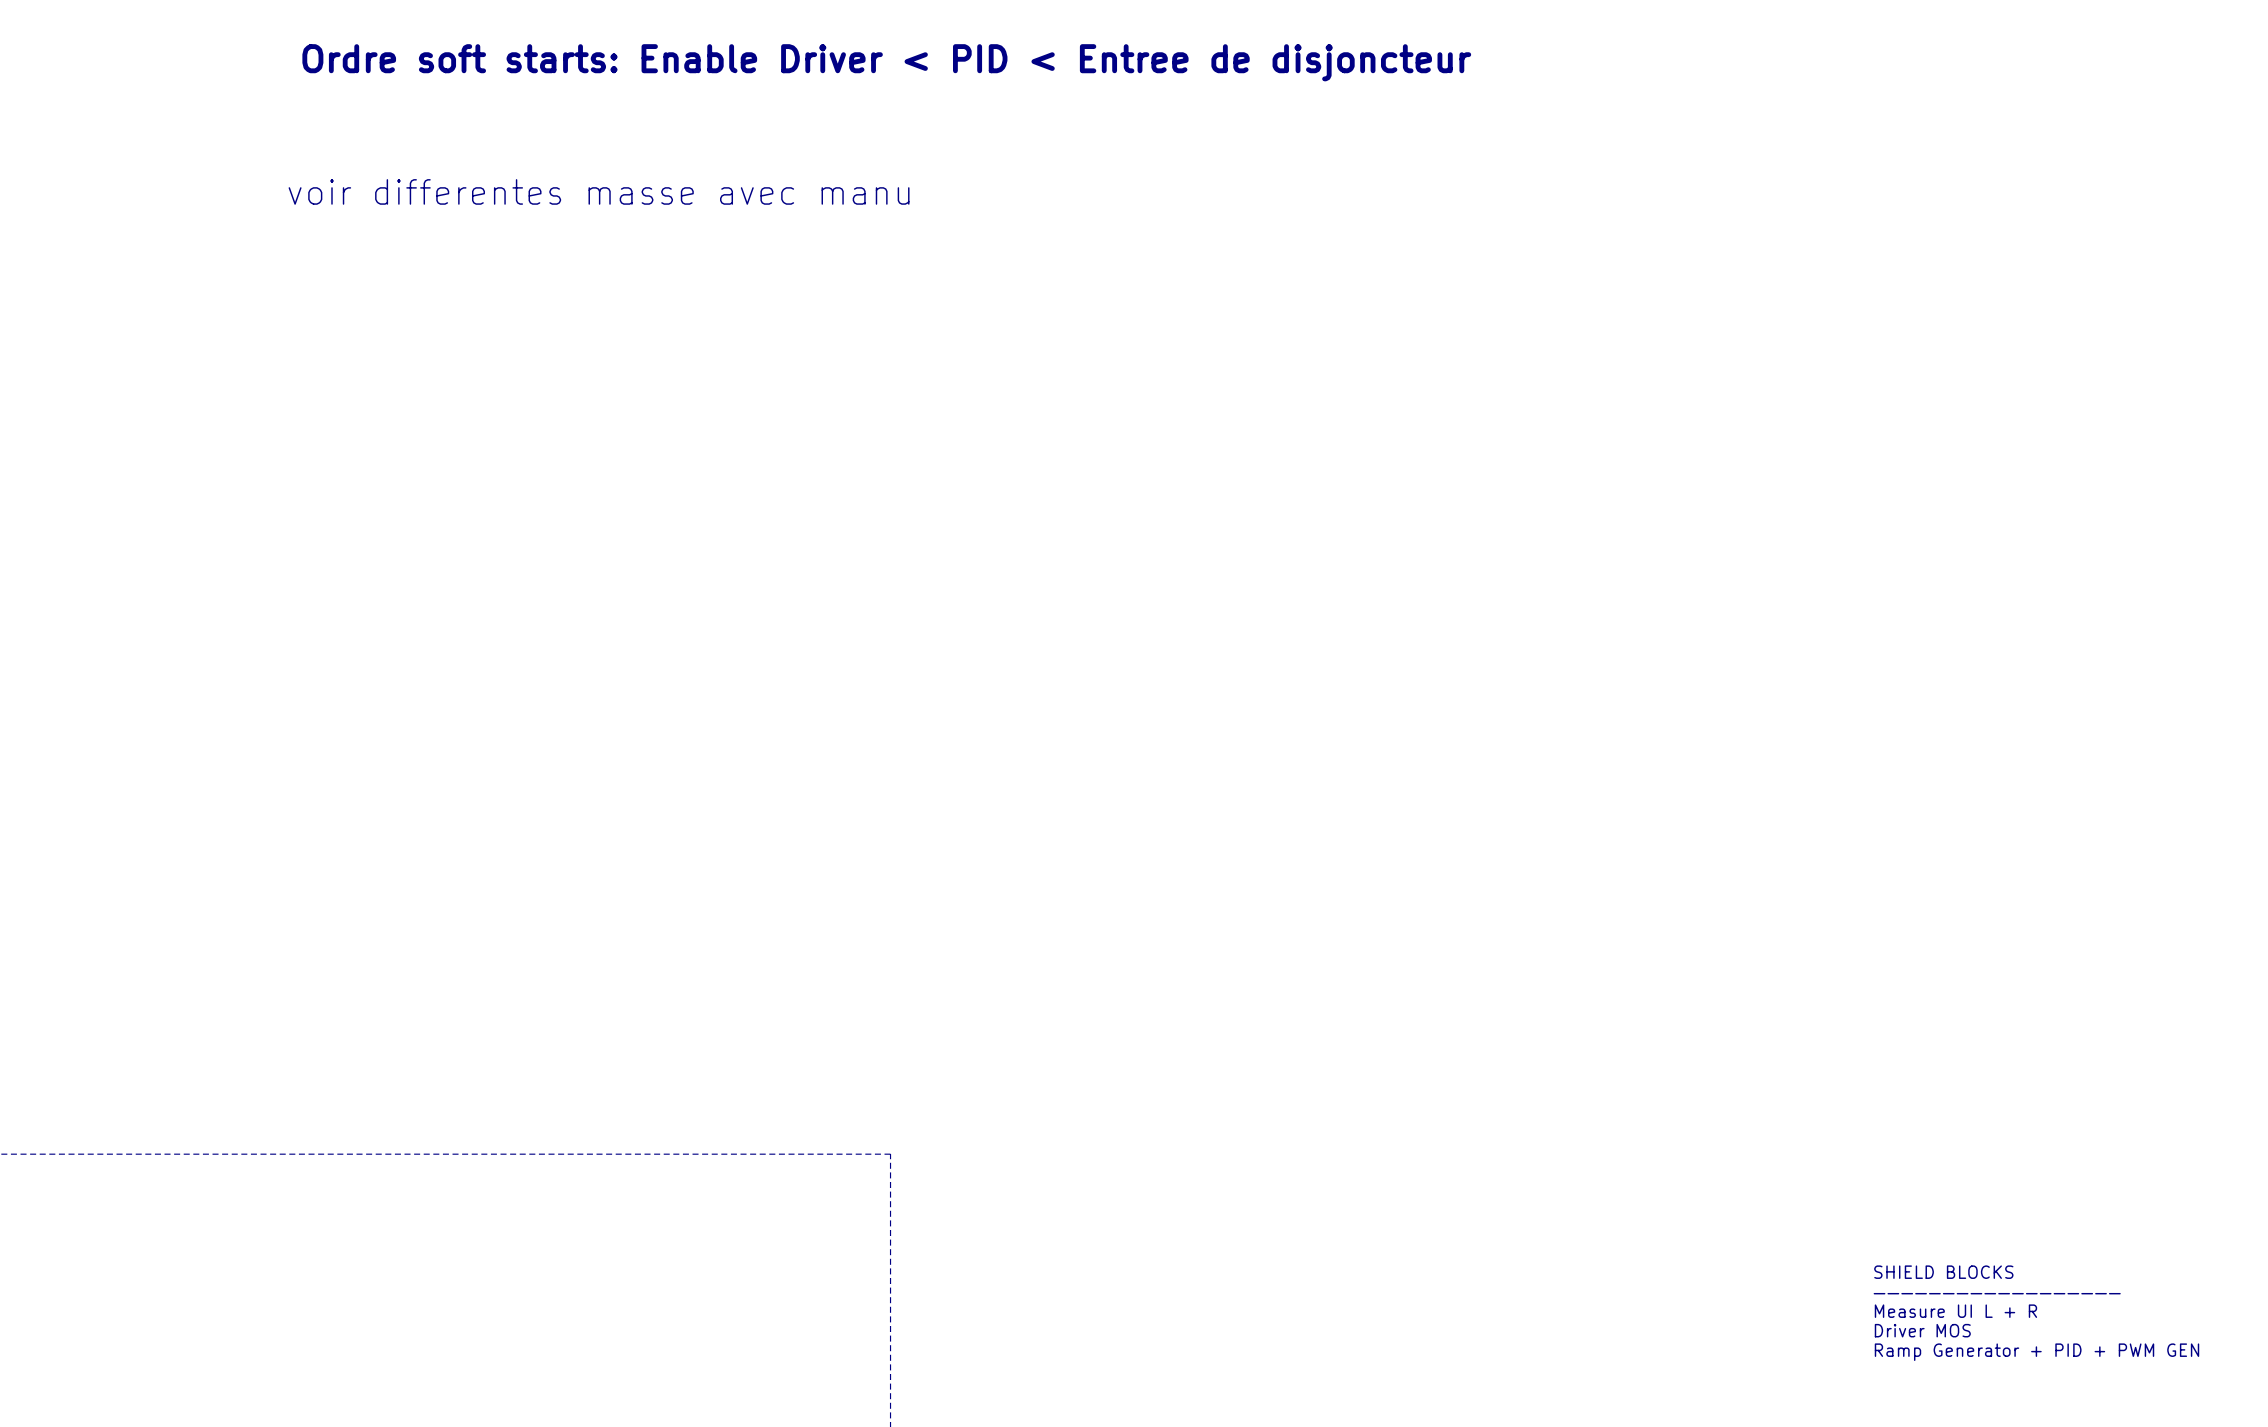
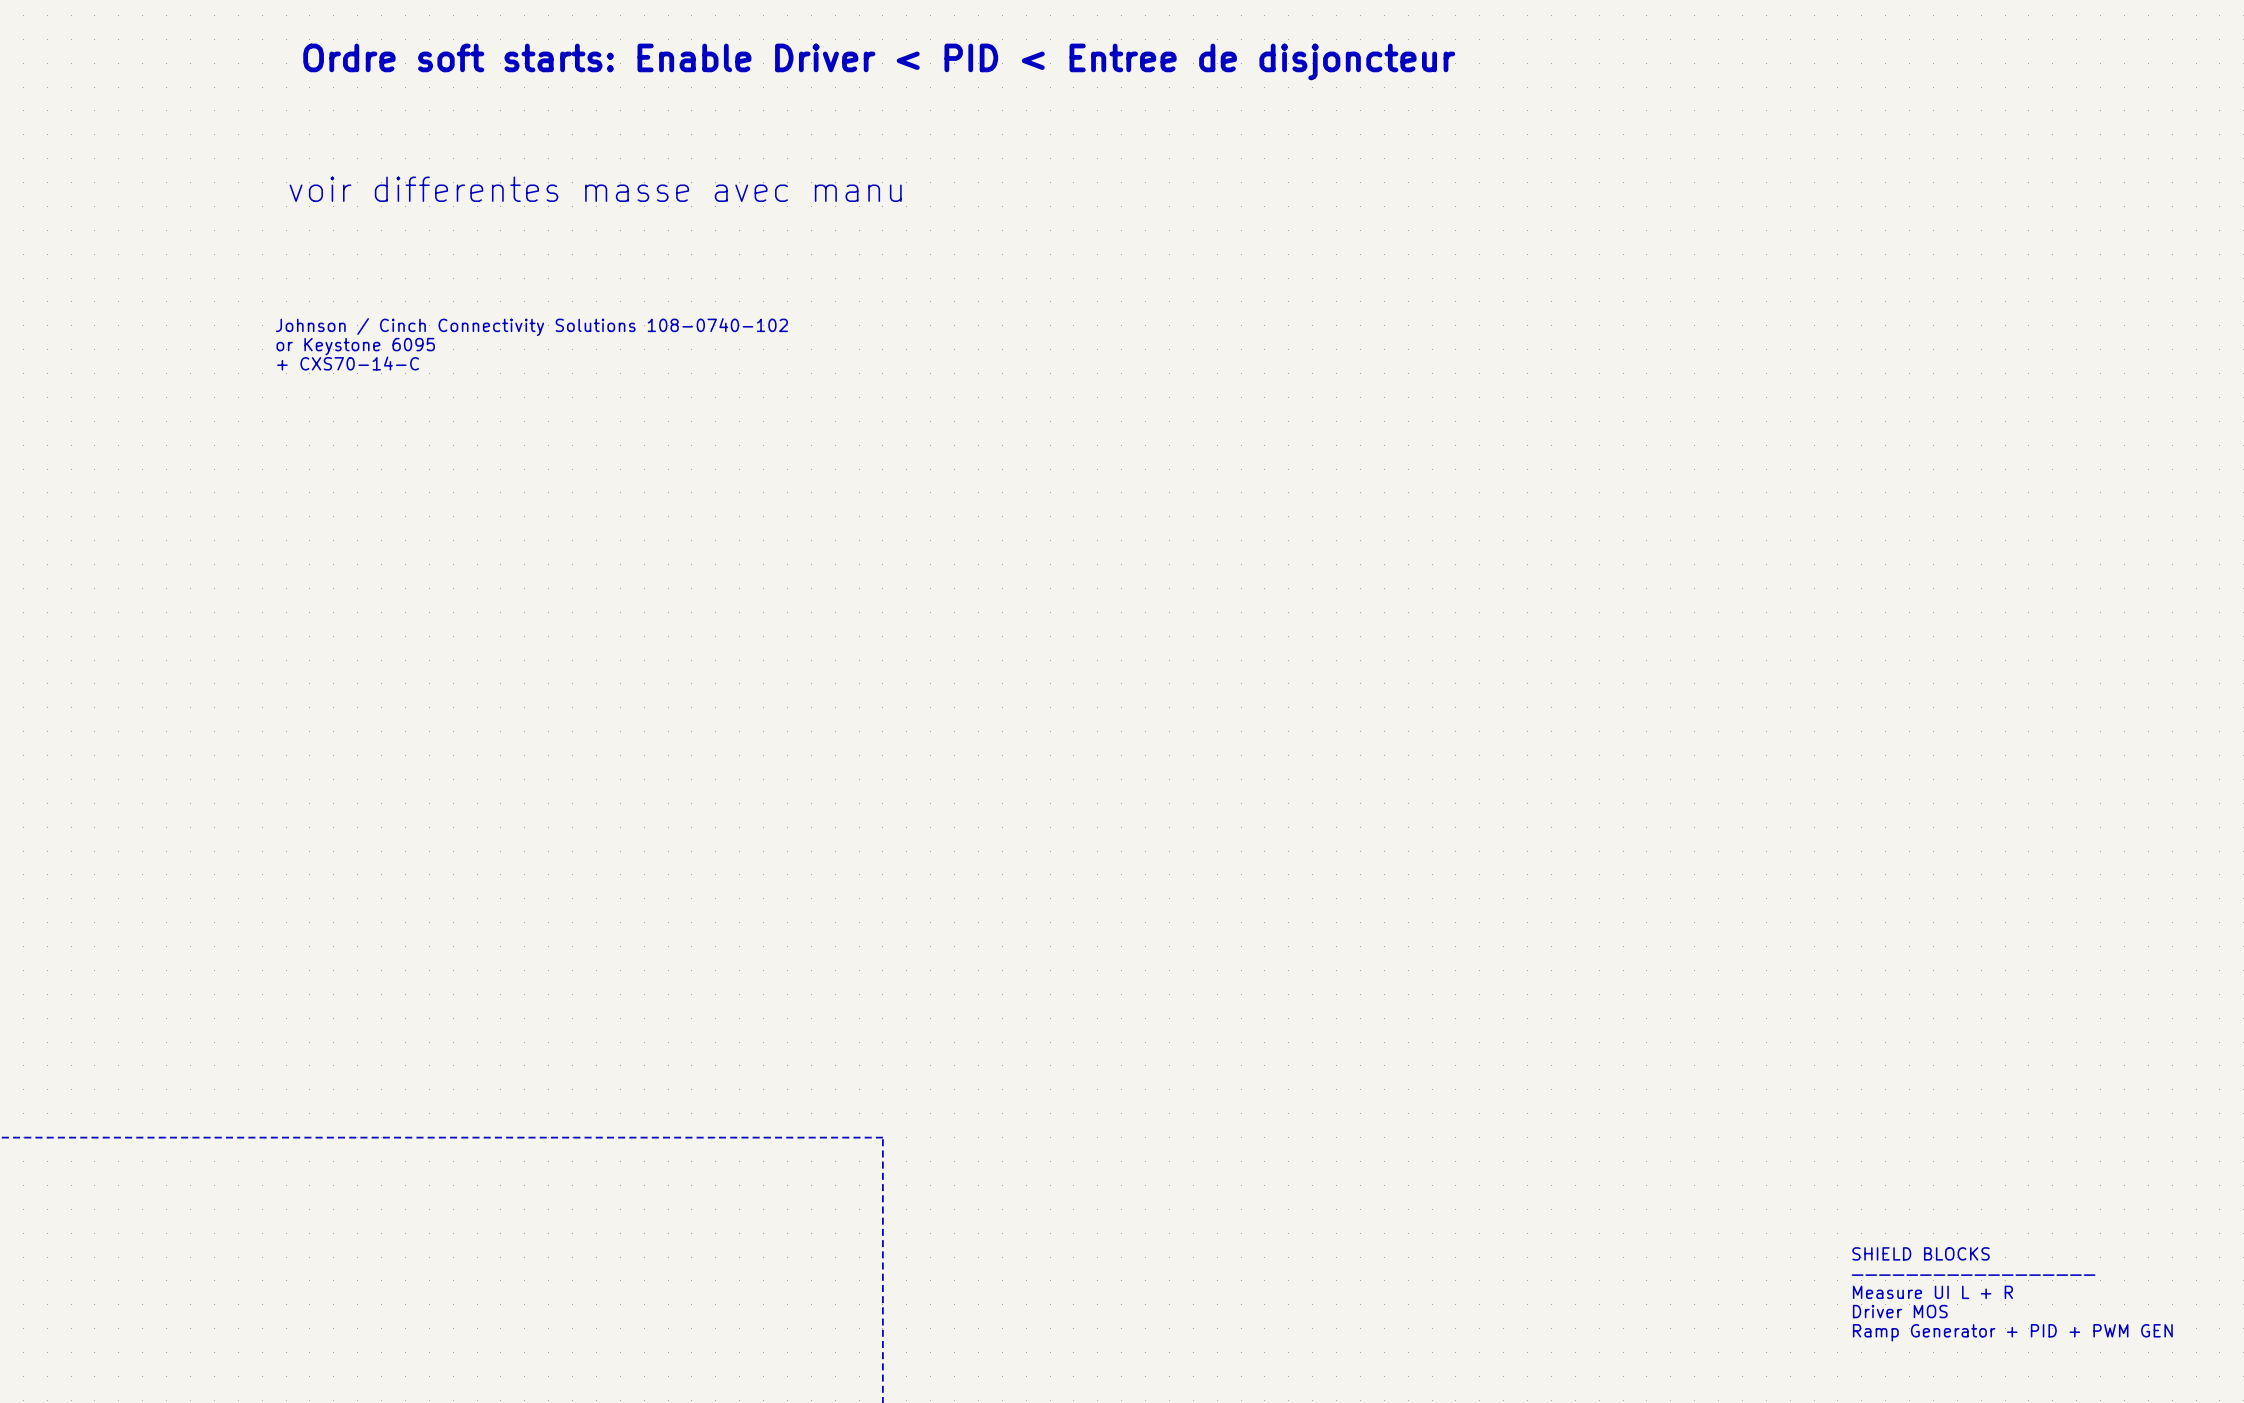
text: none -> Johnson / Cinch Connectivity Solutions 108-0740-102 (531, 327)
text: none -> or Keystone 6095 (355, 346)
text: none -> + CXS70-14-C (348, 363)

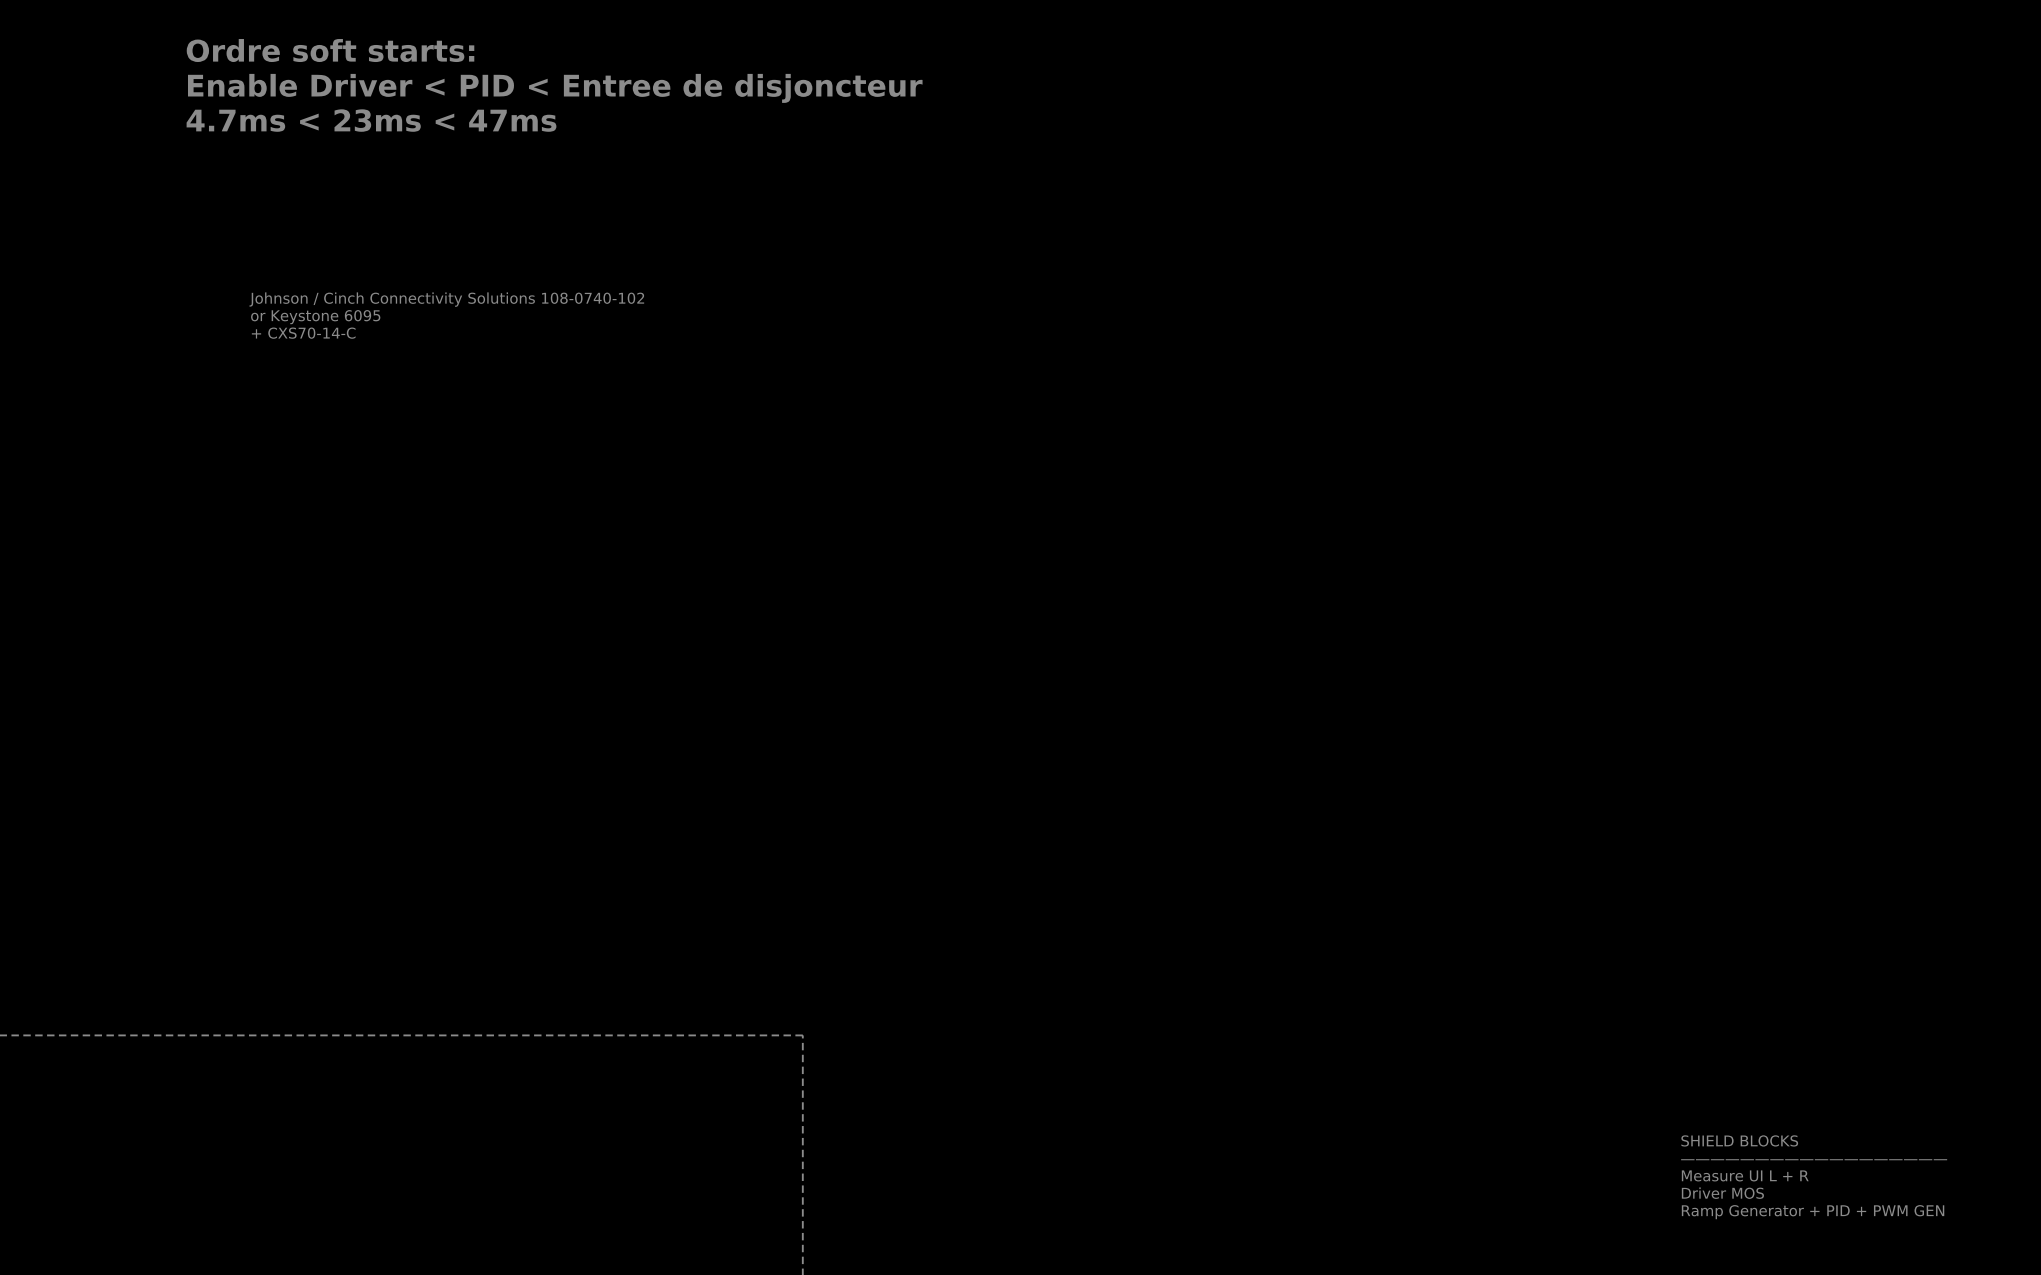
text: none -> Ordre soft starts: (330, 50)
text: Ordre soft starts: Enable Driver < PID < Entree de disjoncteur (879, 61) -> Enable Driver < PID < Entree de disjoncteur (555, 88)
text: none -> 4.7ms < 23ms < 47ms (371, 120)
text: voir differentes masse avec manu (595, 189) -> none

